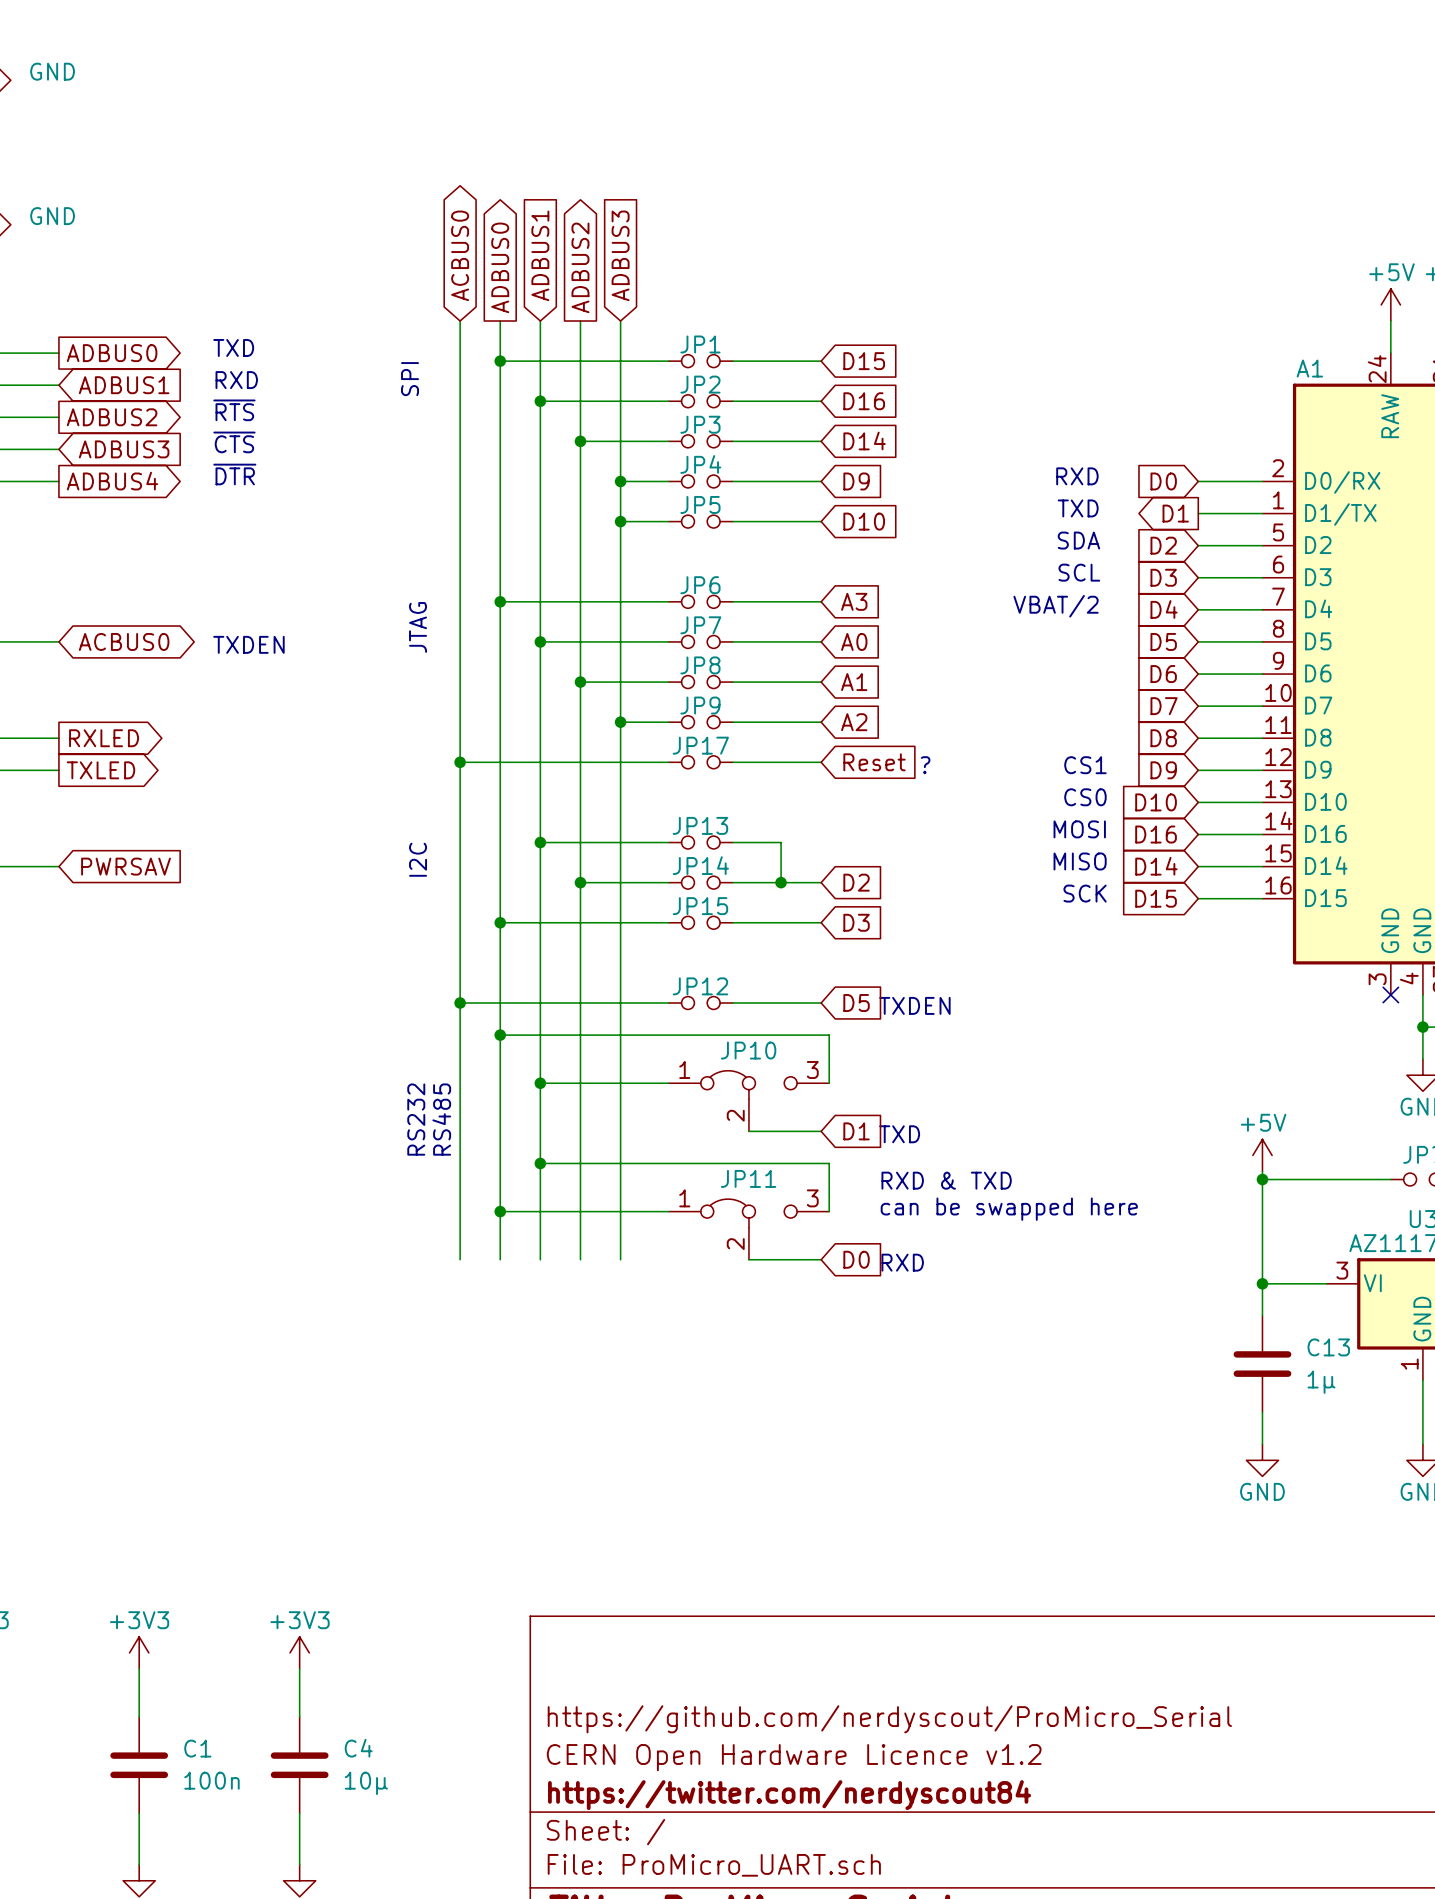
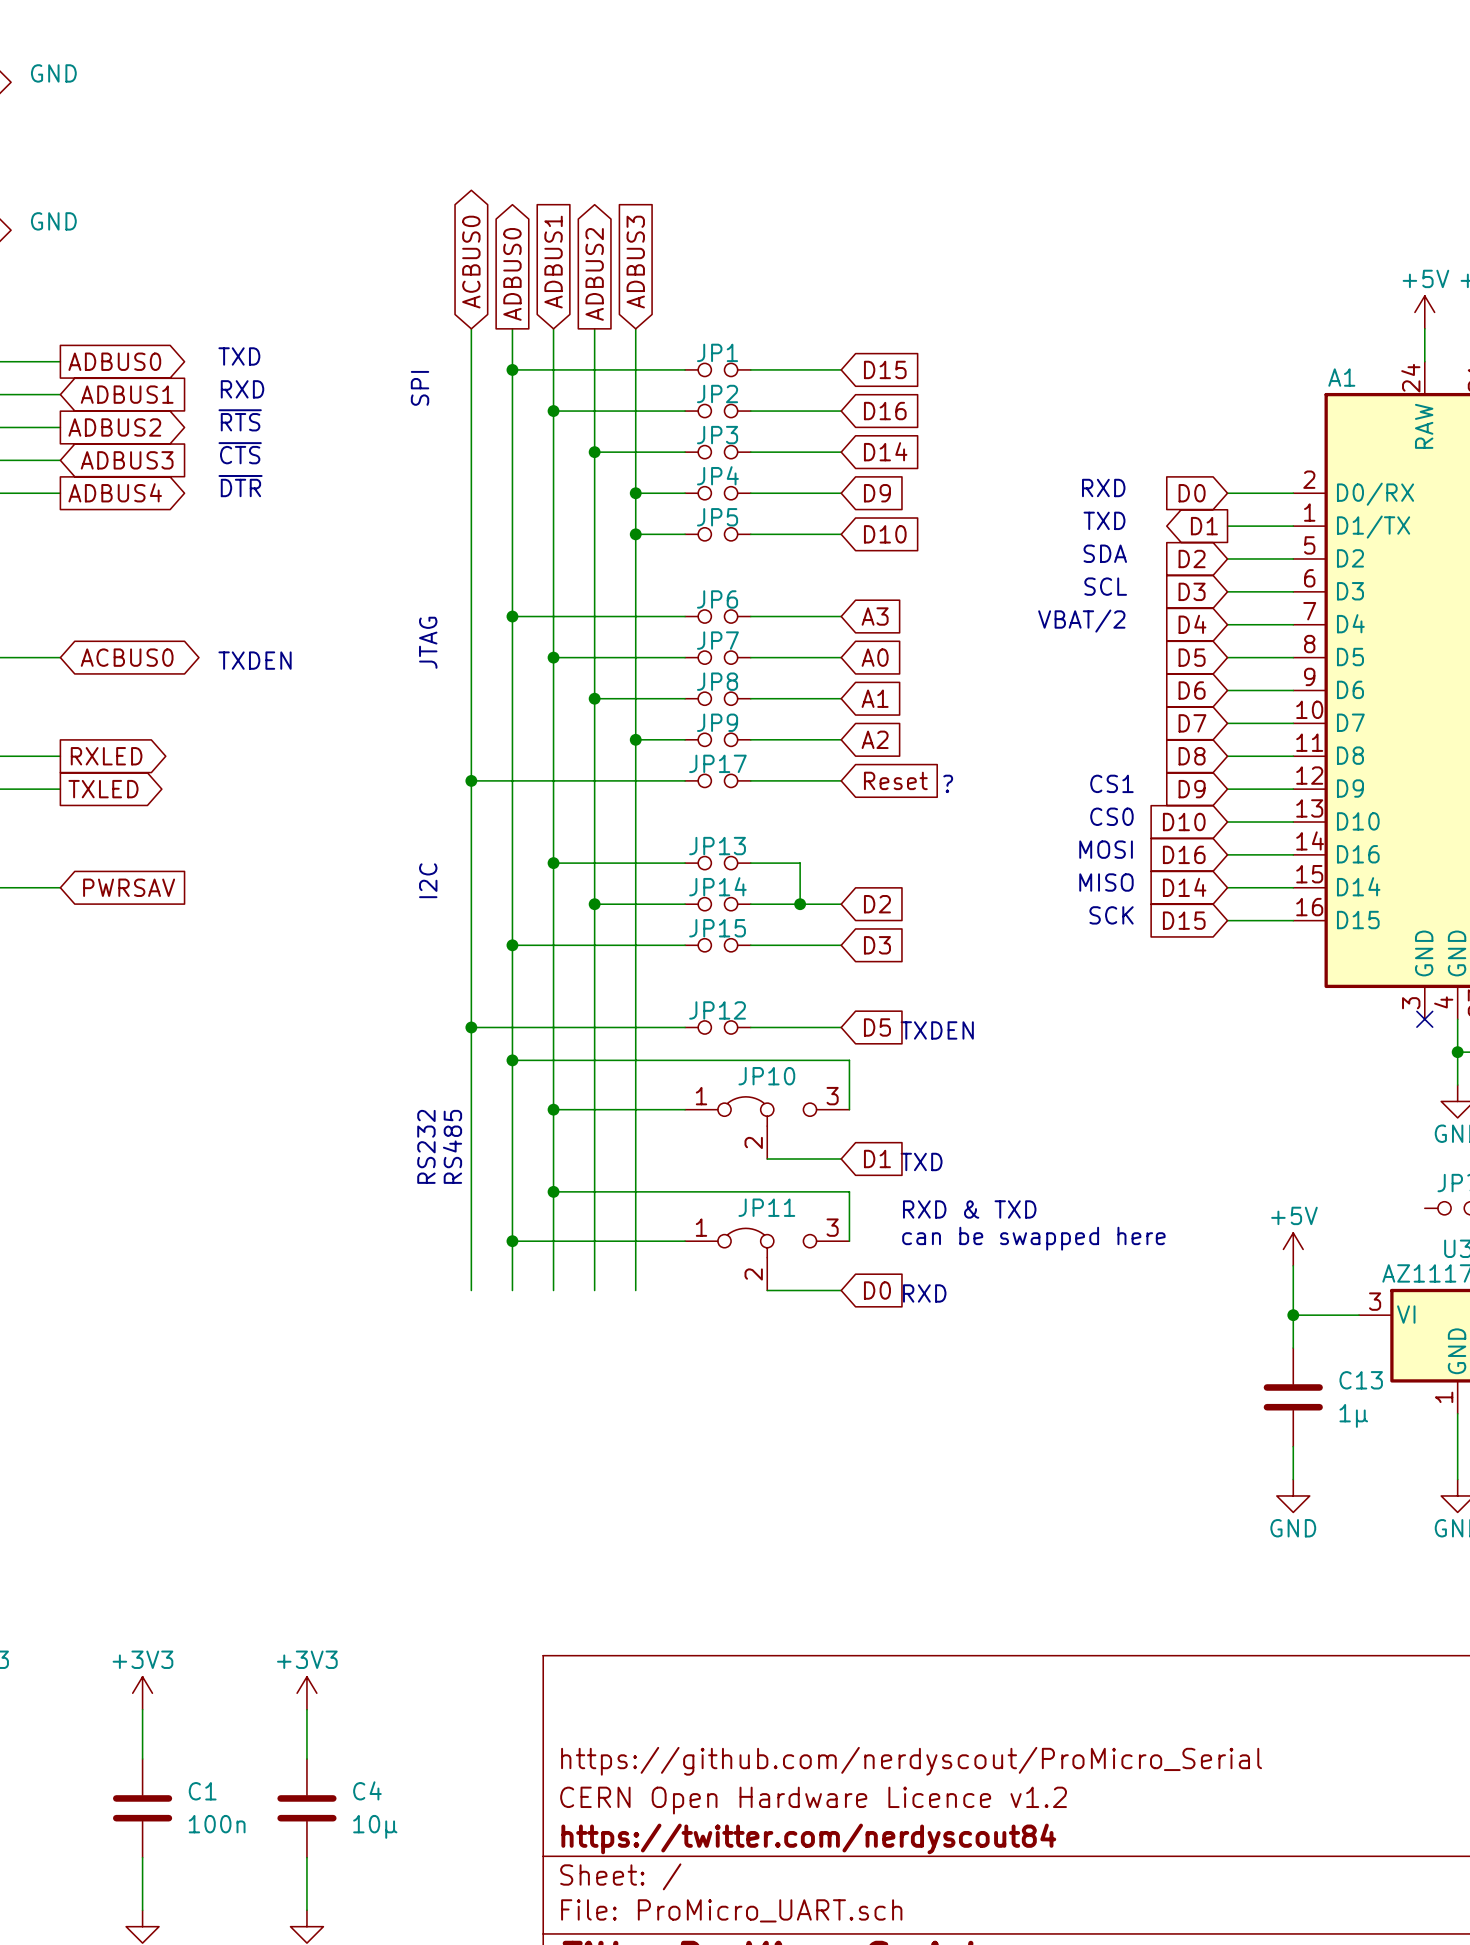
power symbol position: +5V (1262, 1155) -> +5V (1293, 1249)
wire: (1262, 1179) (1390, 1179) -> none
junction: (1262, 1179) -> none

